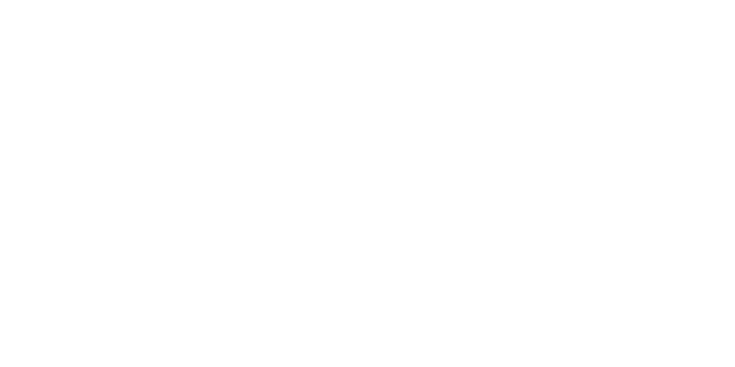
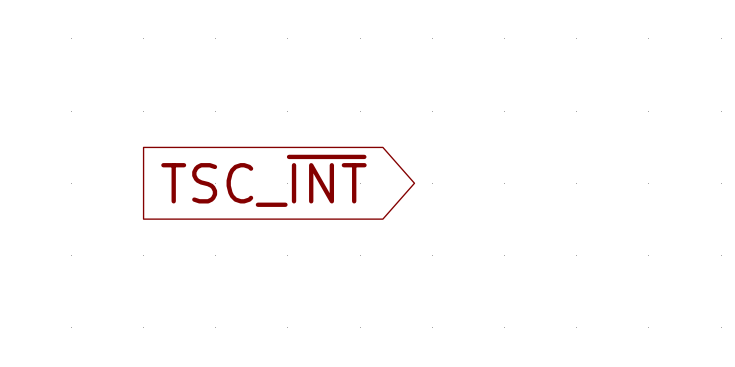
global label: none -> TSC_~{INT} (263, 180)

